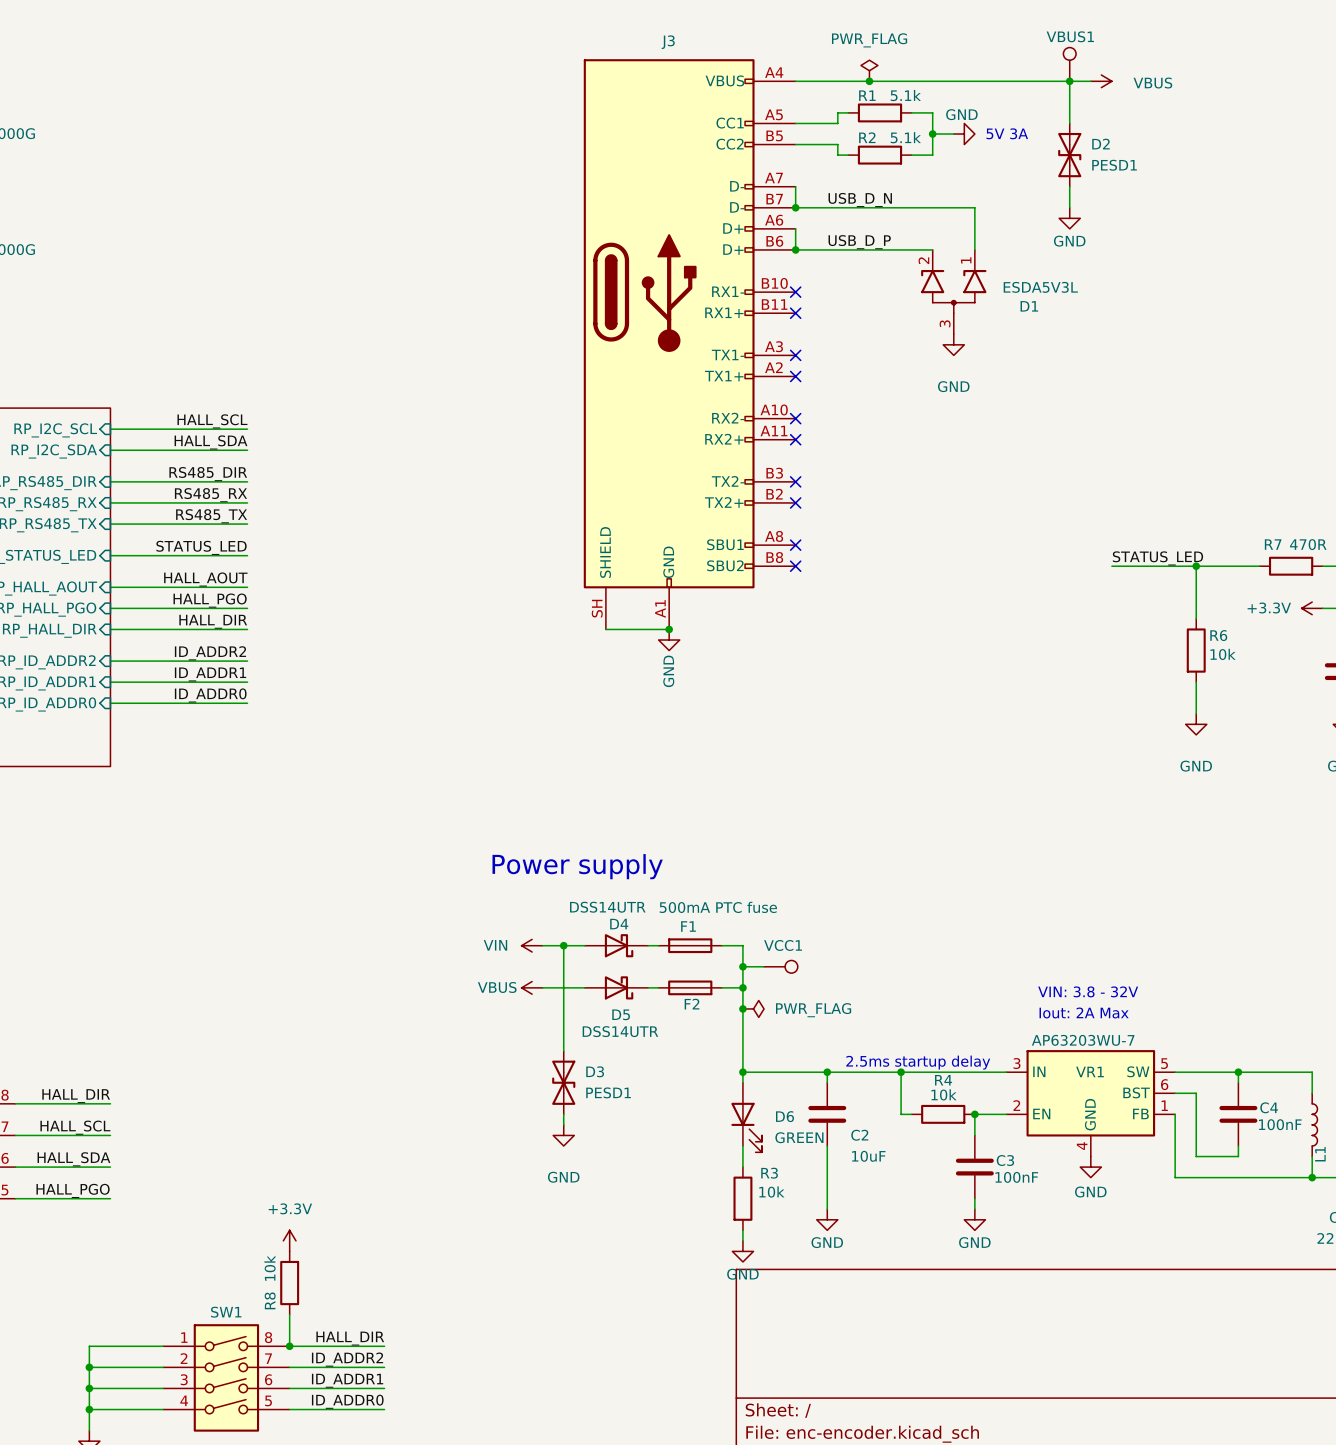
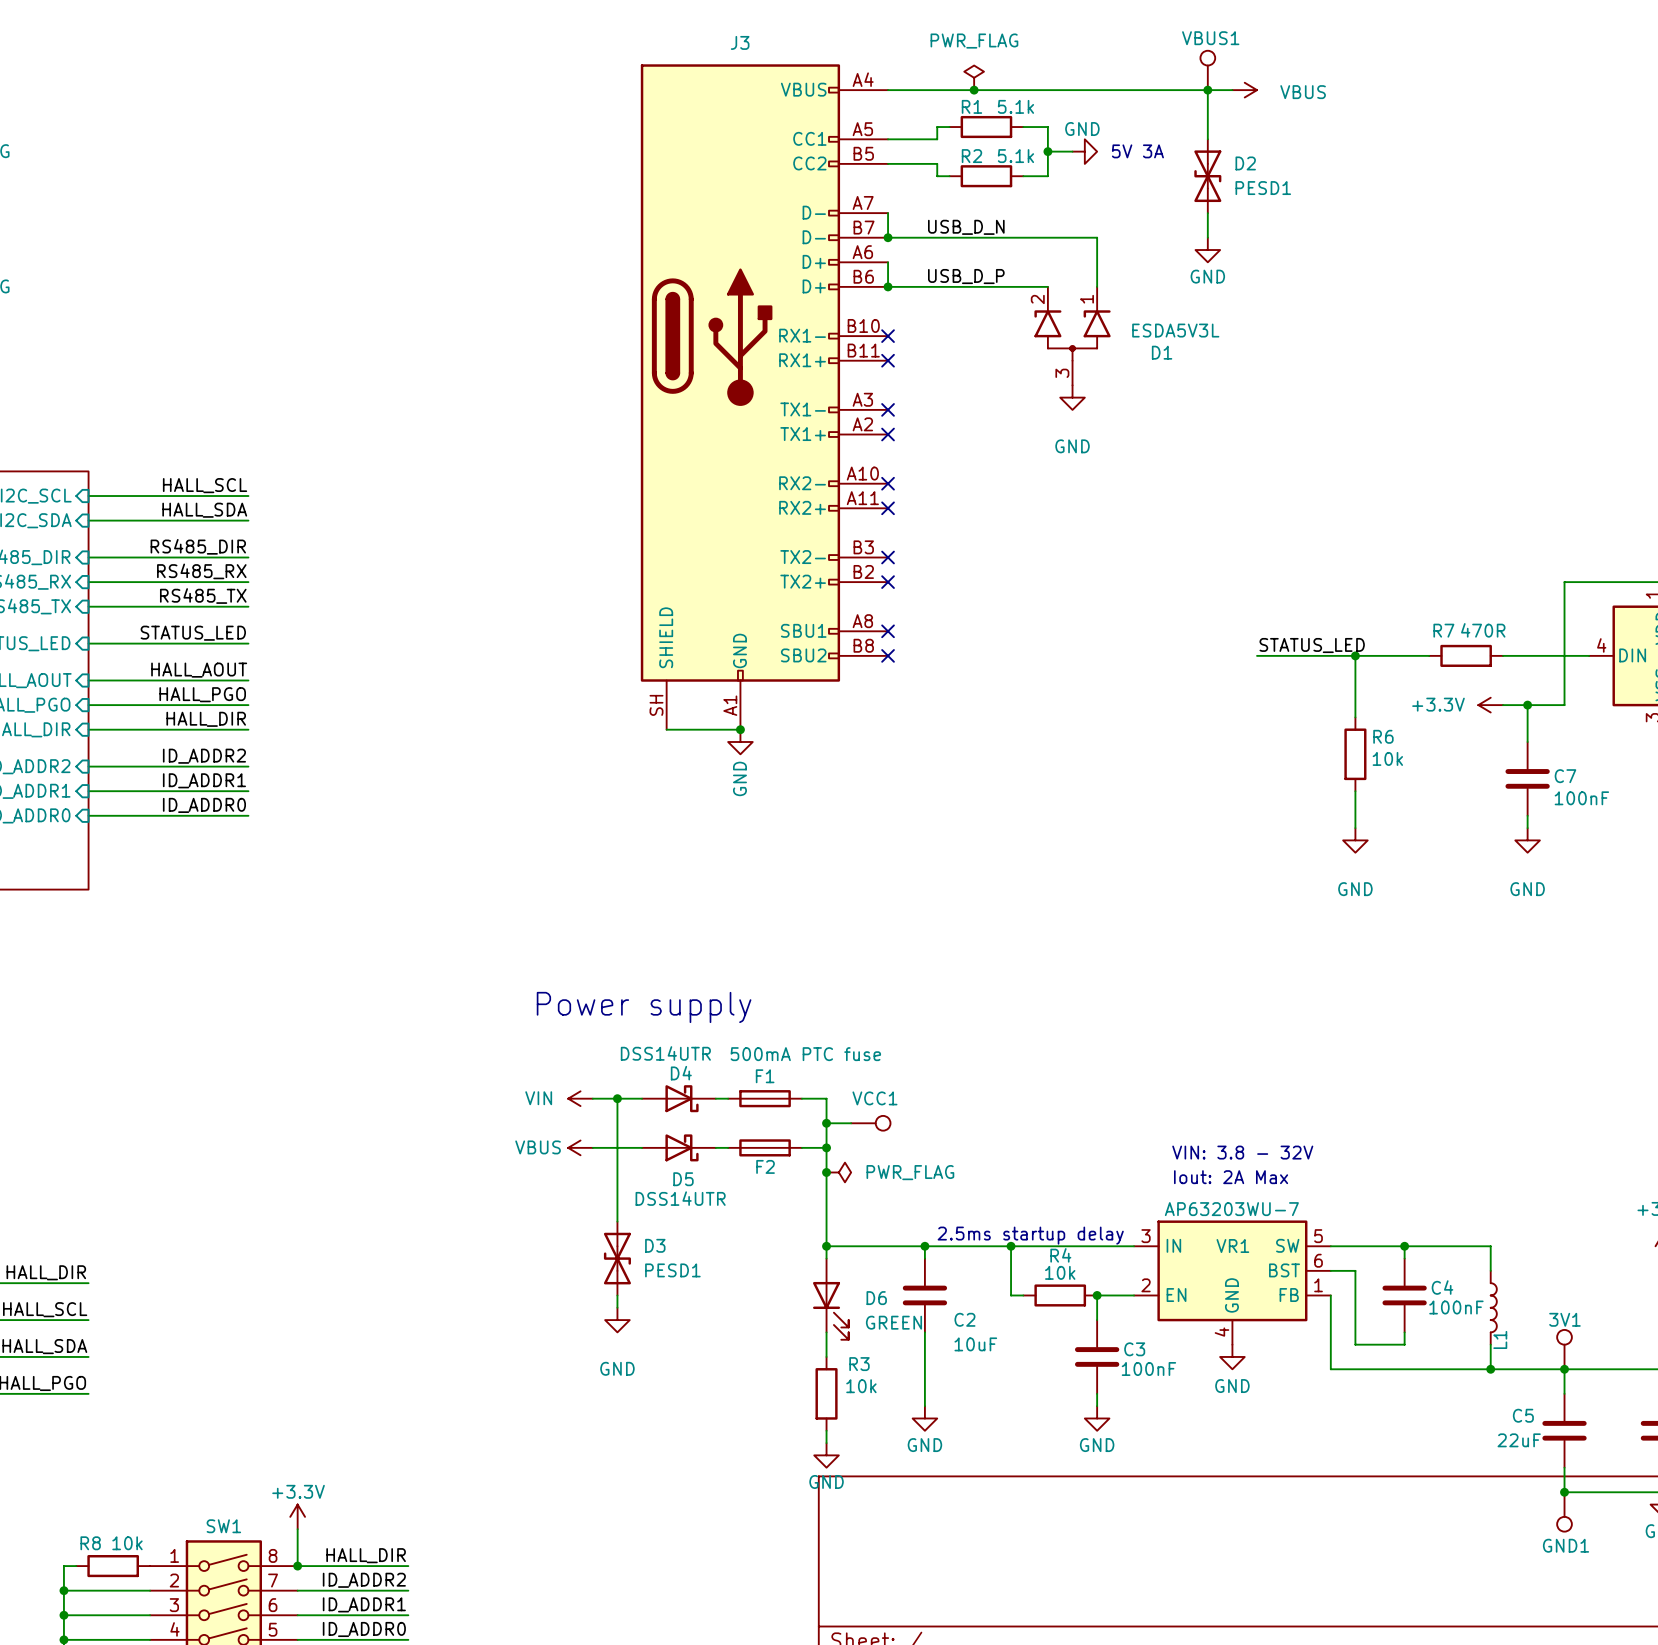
power symbol text position: +3.3V (290, 1208) -> +3.3V (298, 1491)
power symbol position: +3.3V (289, 1240) -> +3.3V (297, 1516)
R8 rotation: 0° (289, 1283) -> 90° clockwise (113, 1566)
R8 position: (289, 1283) -> (113, 1566)
wire: (99, 1346) (163, 1346) -> none

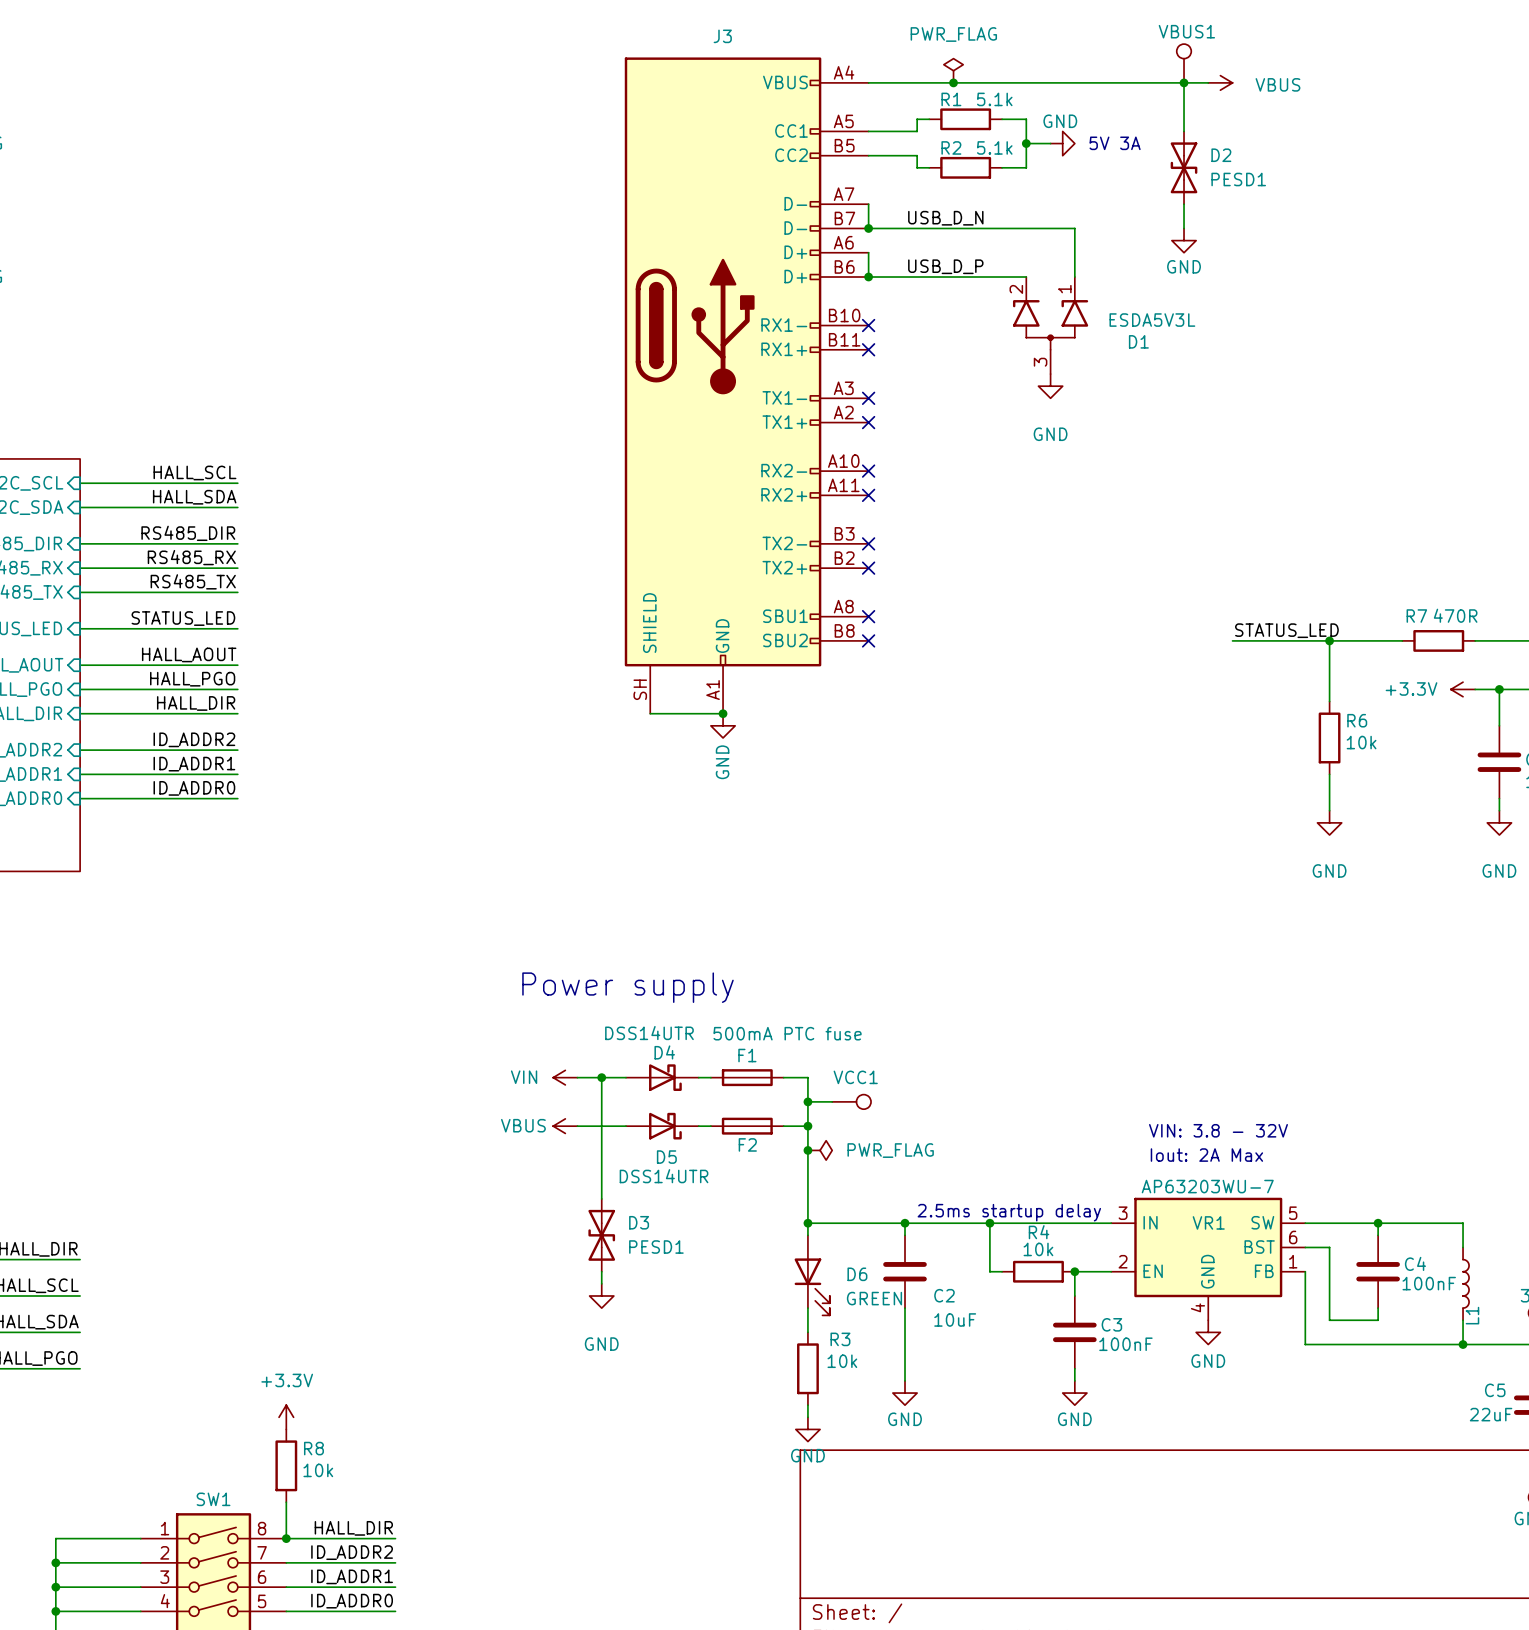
power symbol text position: +3.3V (298, 1491) -> +3.3V (287, 1380)
power symbol position: +3.3V (297, 1516) -> +3.3V (286, 1417)
wire: none -> (67, 1538) (140, 1538)
R8 rotation: 0° (113, 1566) -> 90° clockwise (286, 1465)
R8 position: (113, 1566) -> (286, 1465)

